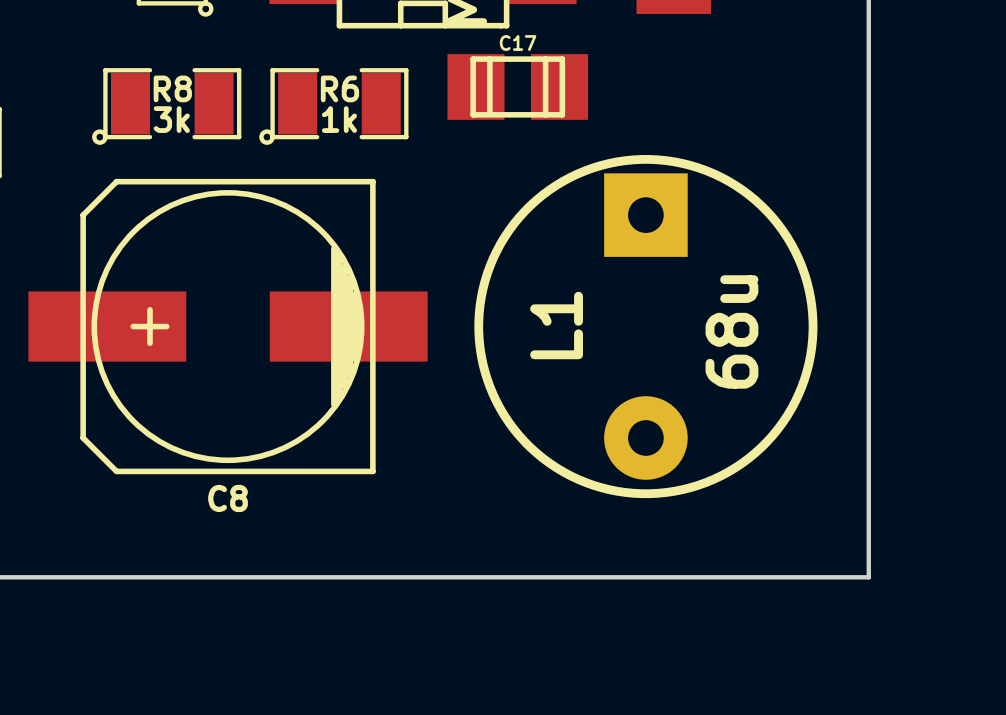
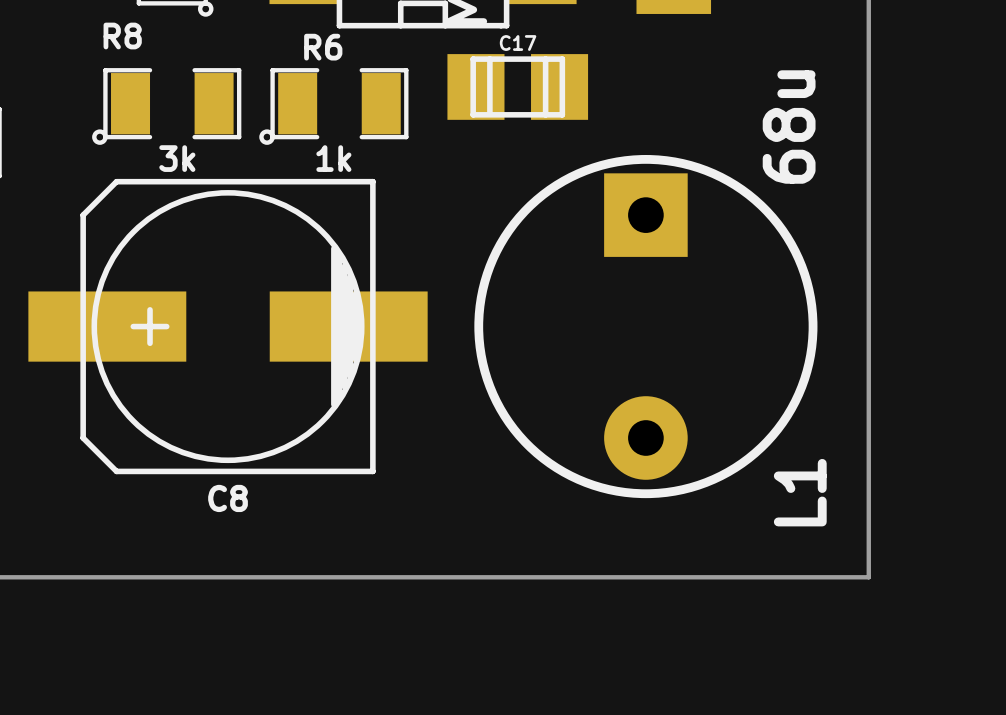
R8 name position: R8 (172, 88) -> R8 (122, 36)
R6 name position: R6 (339, 88) -> R6 (323, 47)
R8 value position: 3k (171, 119) -> 3k (177, 158)
R6 value position: 1k (339, 119) -> 1k (333, 158)
L1 name position: L1 (556, 325) -> L1 (800, 492)
L1 value position: 68u (731, 331) -> 68u (789, 127)

